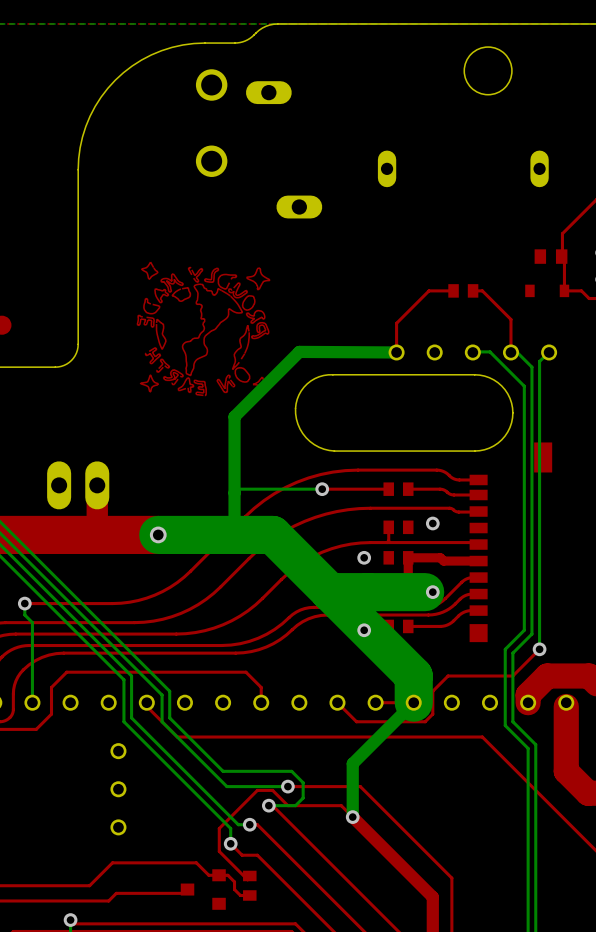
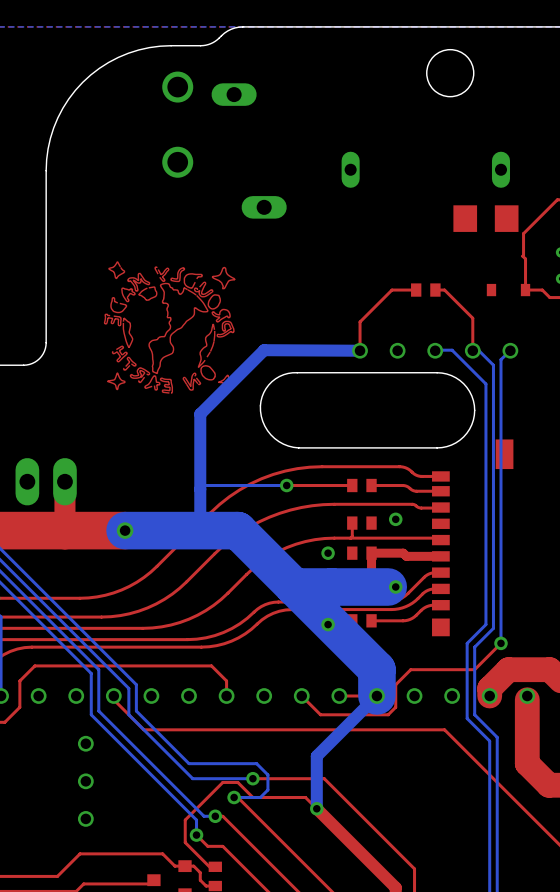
part: none -> (485, 218)
part: (551, 256) -> none

